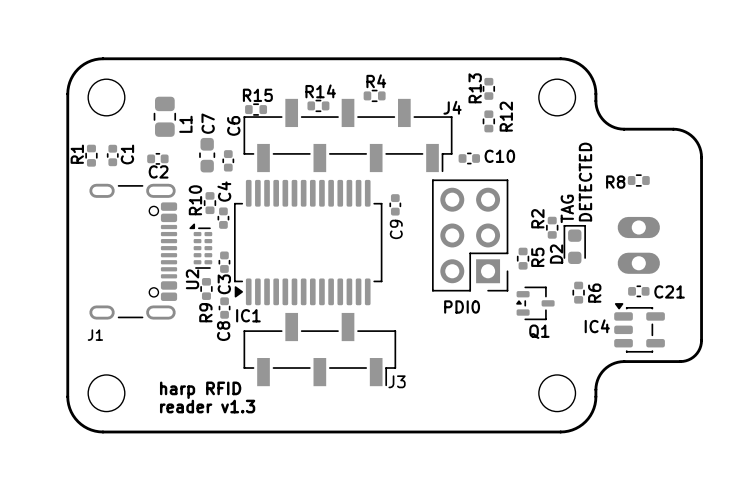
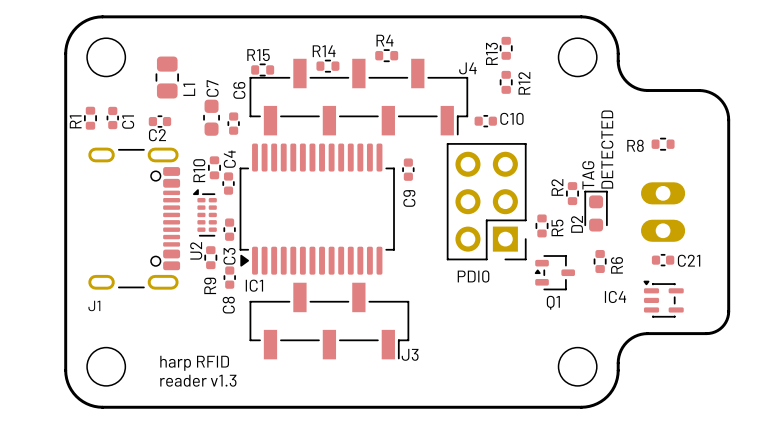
IC4 footprint: [614, 303, 665, 353] -> [643, 280, 684, 318]

